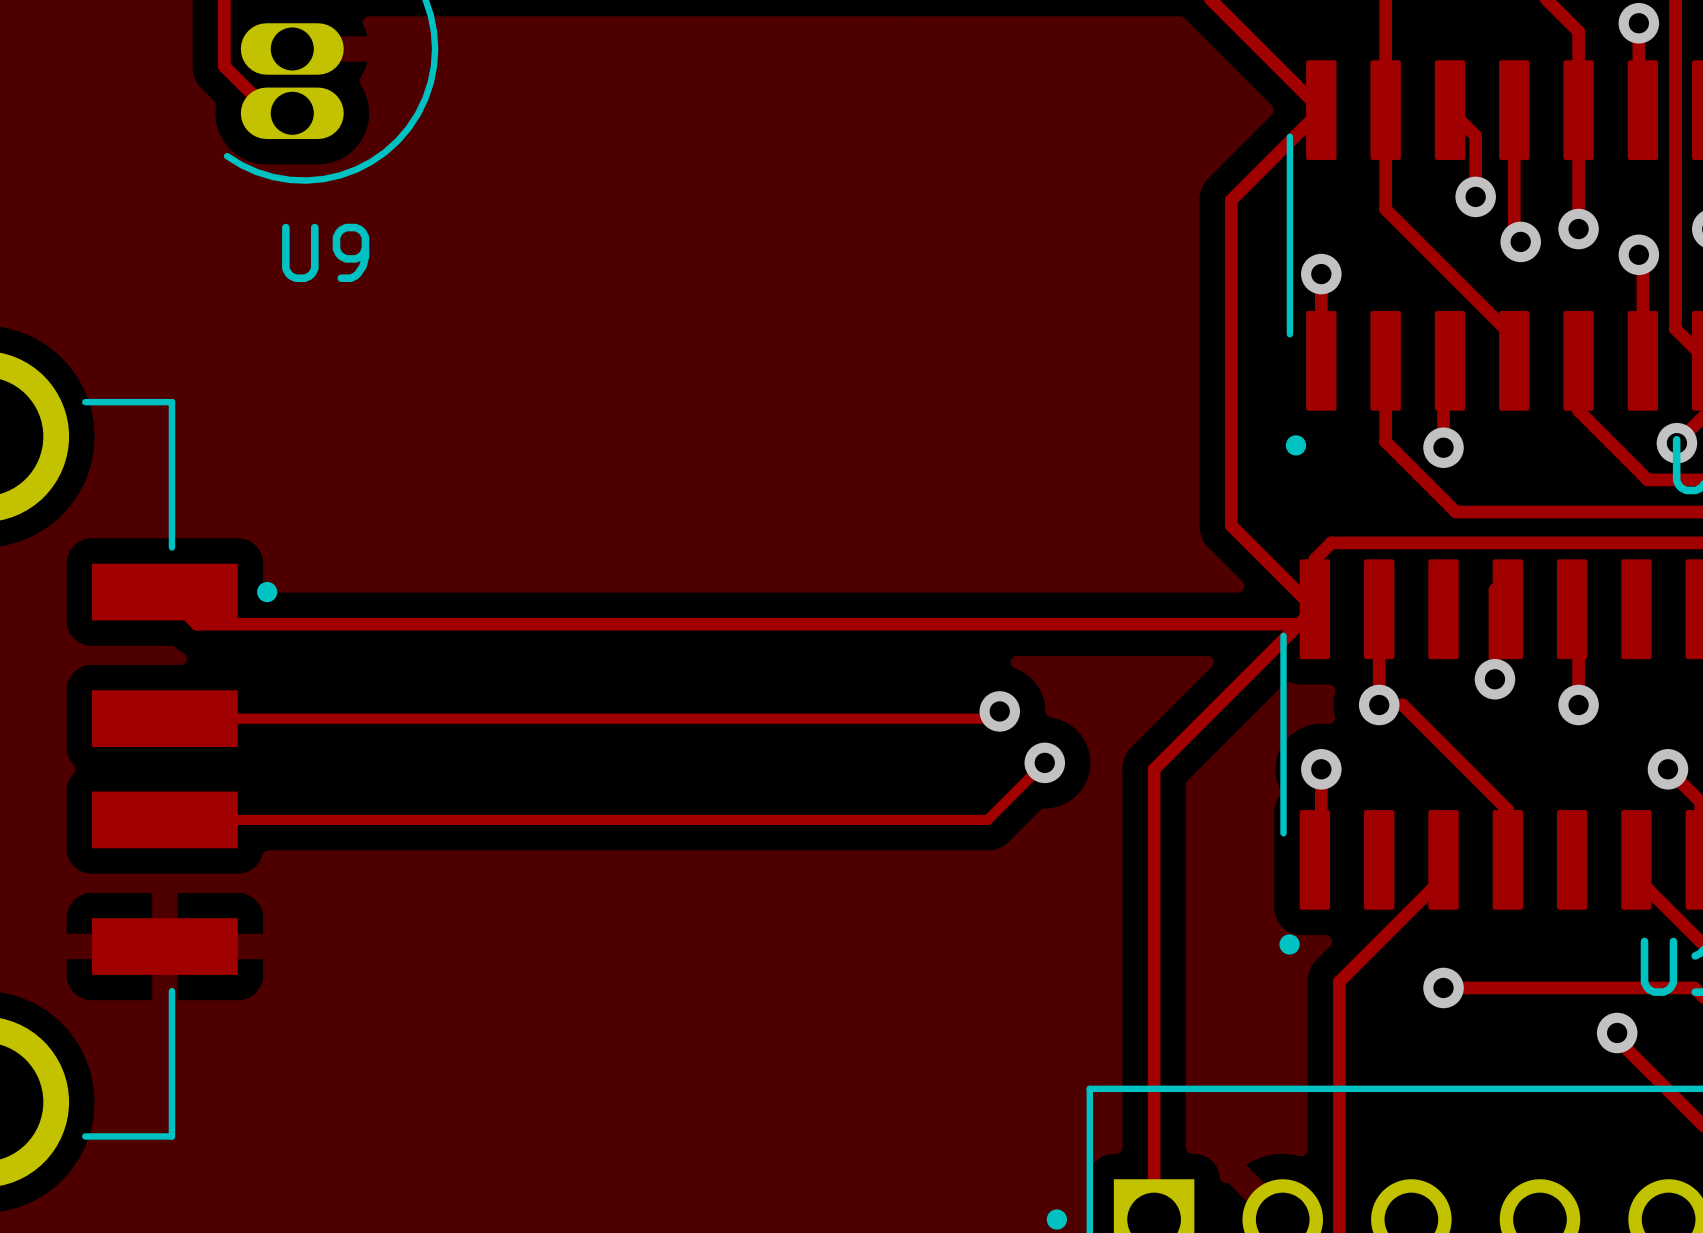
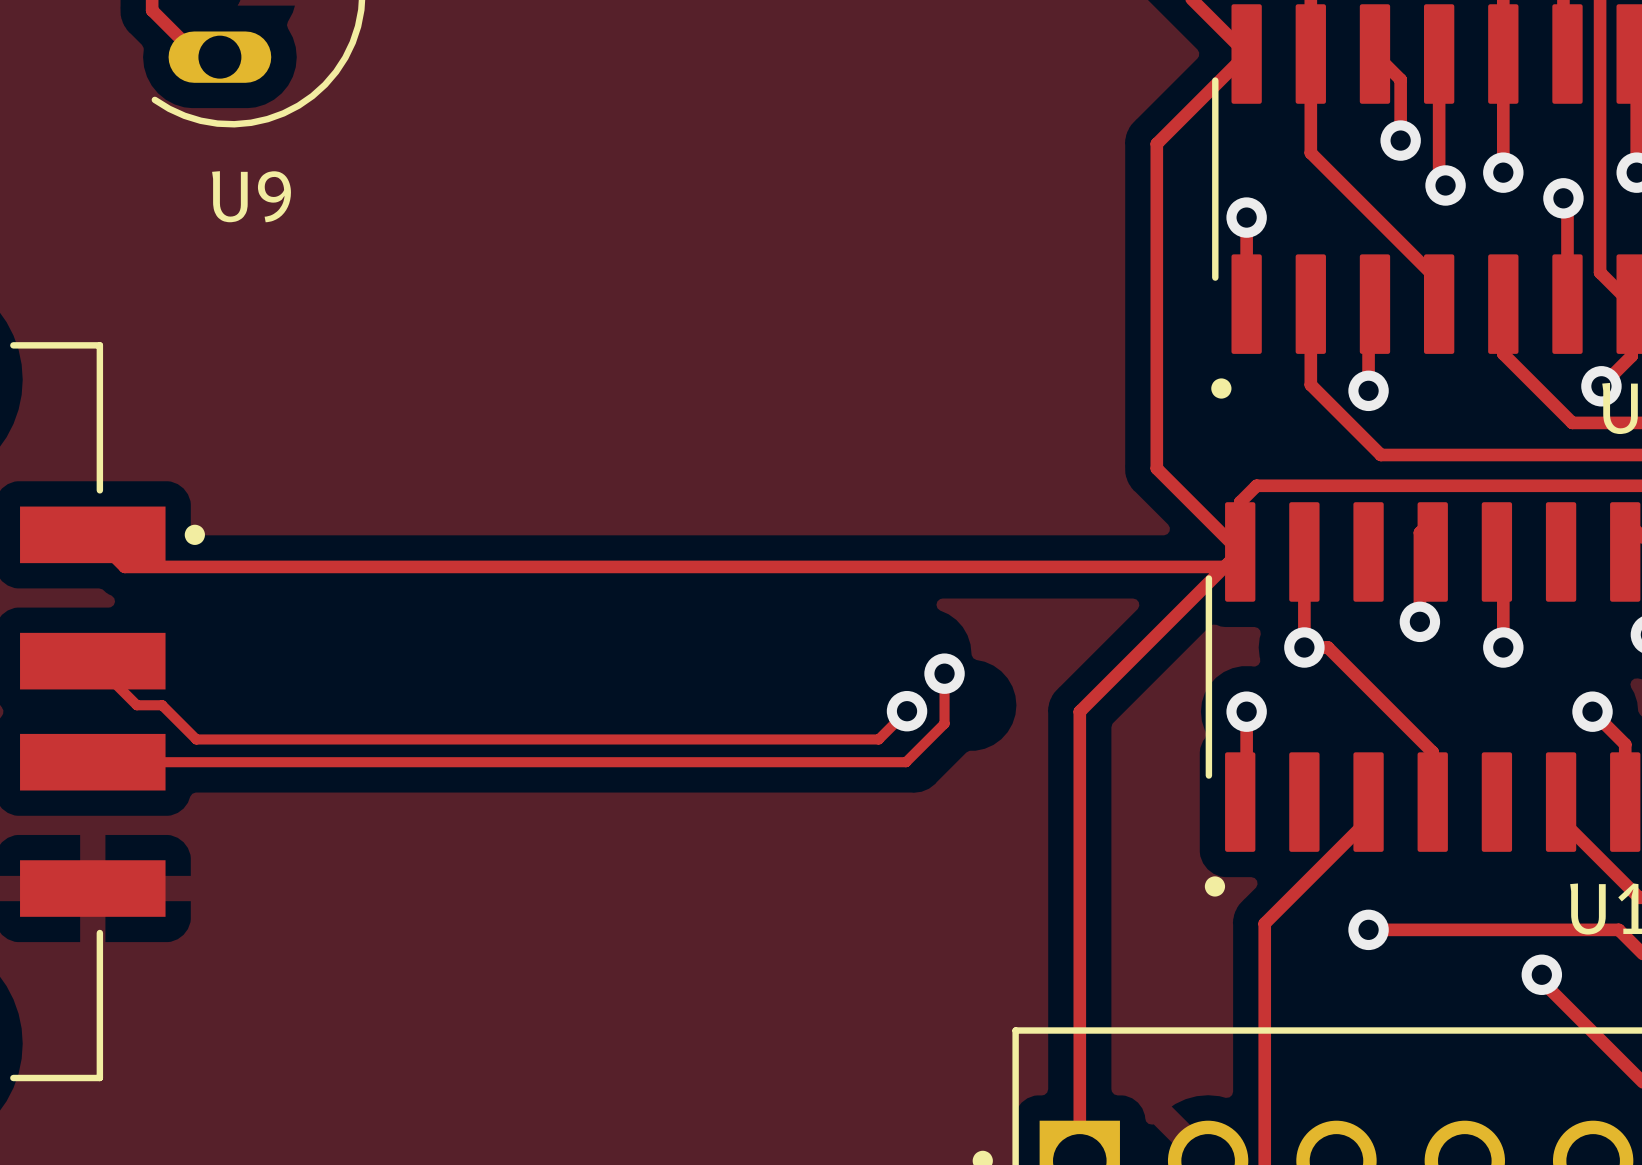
track: (999, 711) (992, 718) (164, 718) -> (907, 711) (878, 739) (196, 739) (162, 705) (136, 705) (92, 661)
via: (999, 711) -> none
via: none -> (944, 673)
track: (1044, 762) (987, 819) (979, 819) -> (944, 673) (944, 723) (906, 762)
via: (1044, 762) -> none
via: none -> (907, 711)

